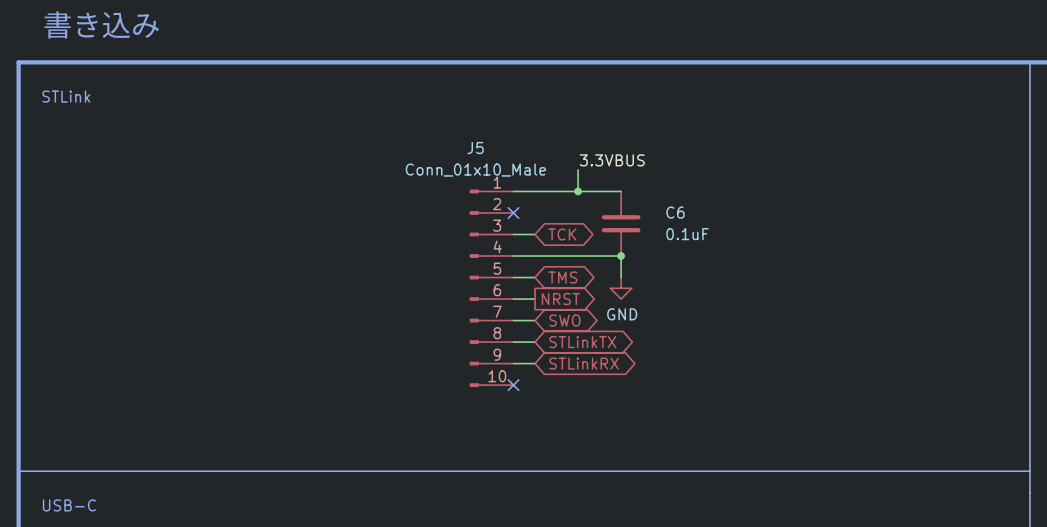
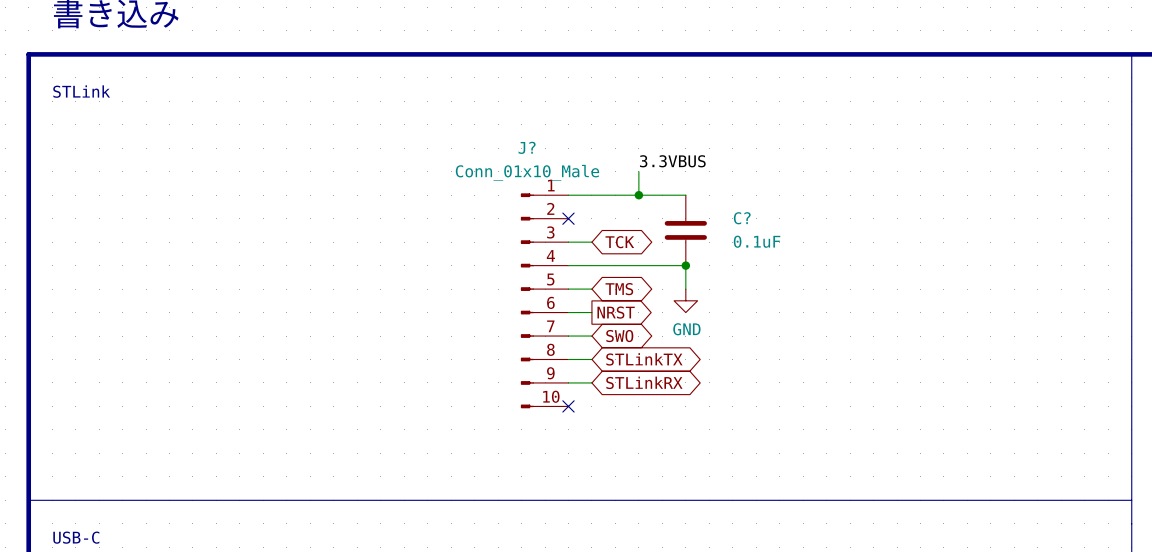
J5 name: J5 (475, 148) -> J? (527, 147)
C6 name: C6 (675, 212) -> C? (742, 218)

